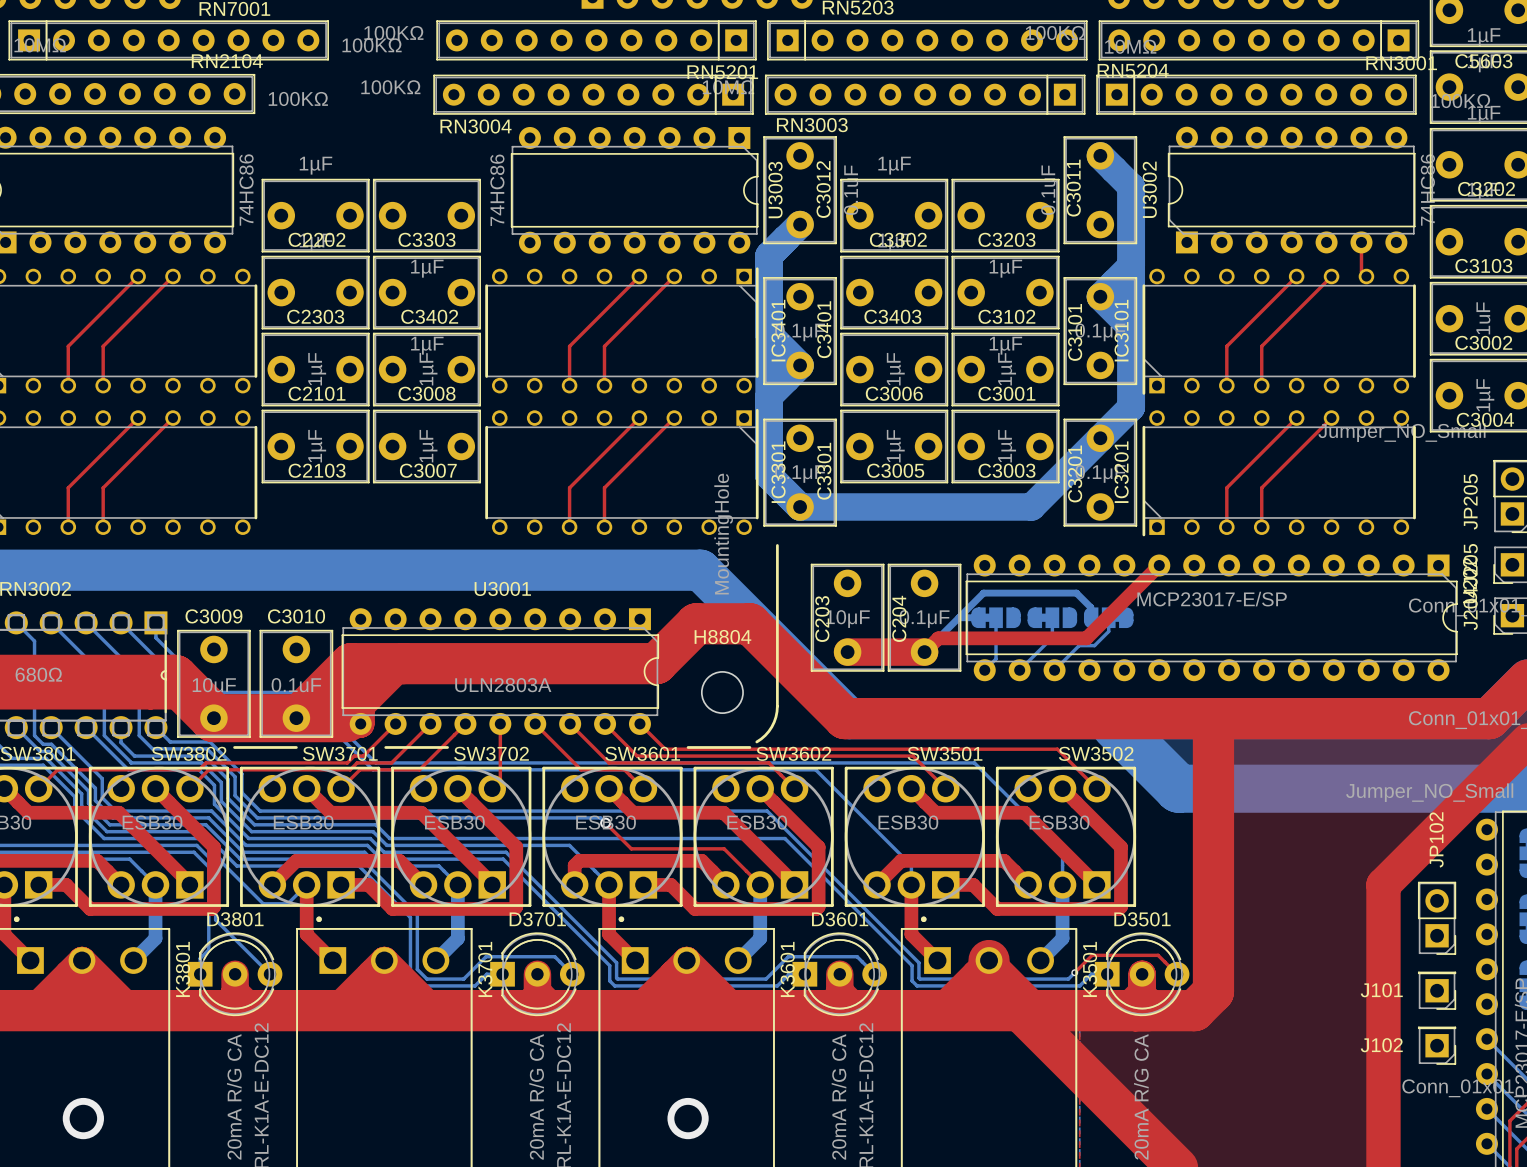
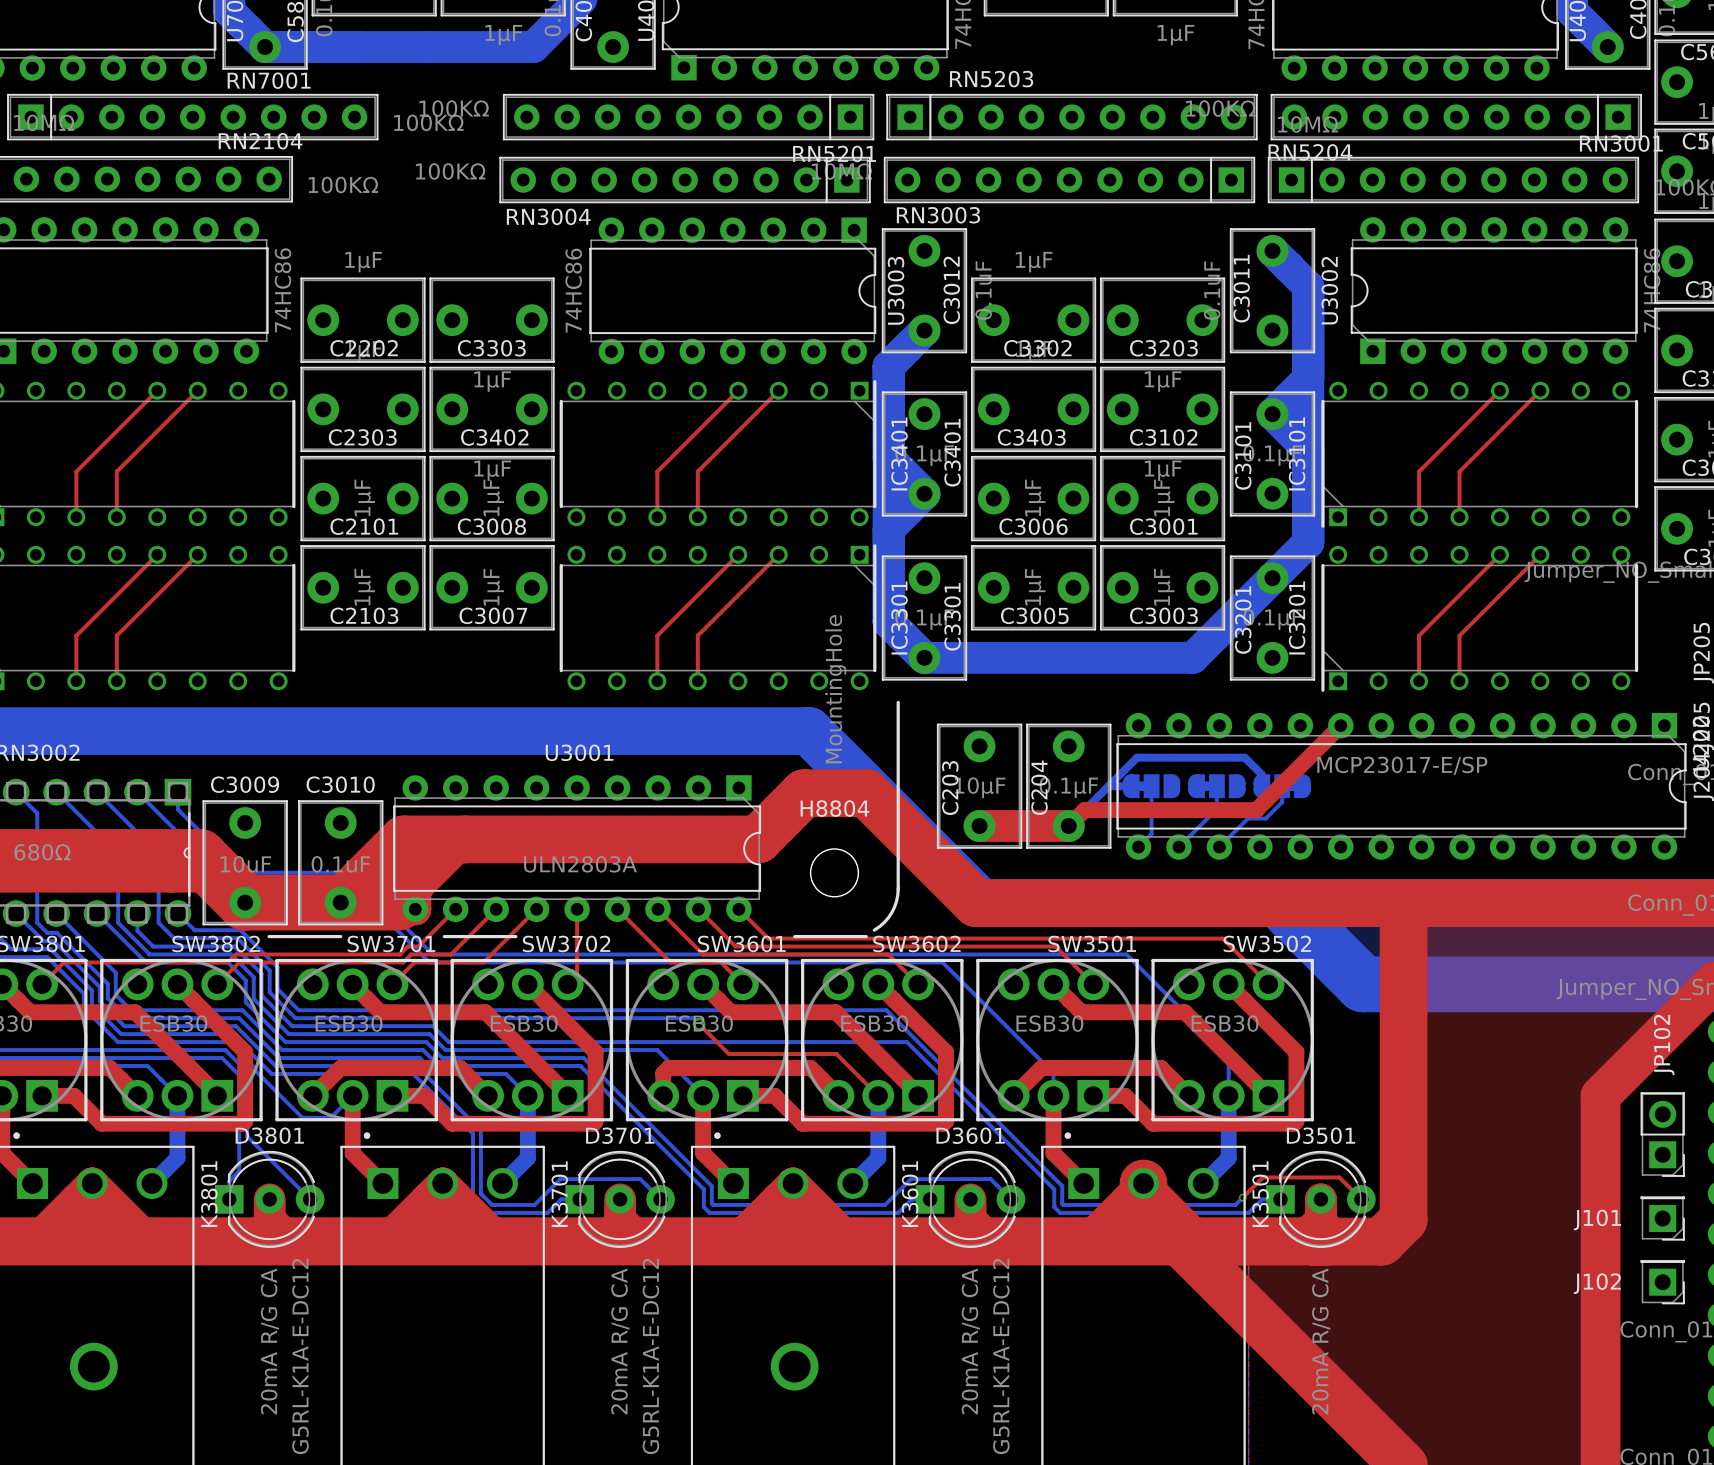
top track: (1361, 242) (1361, 271) (1366, 276) -> none

